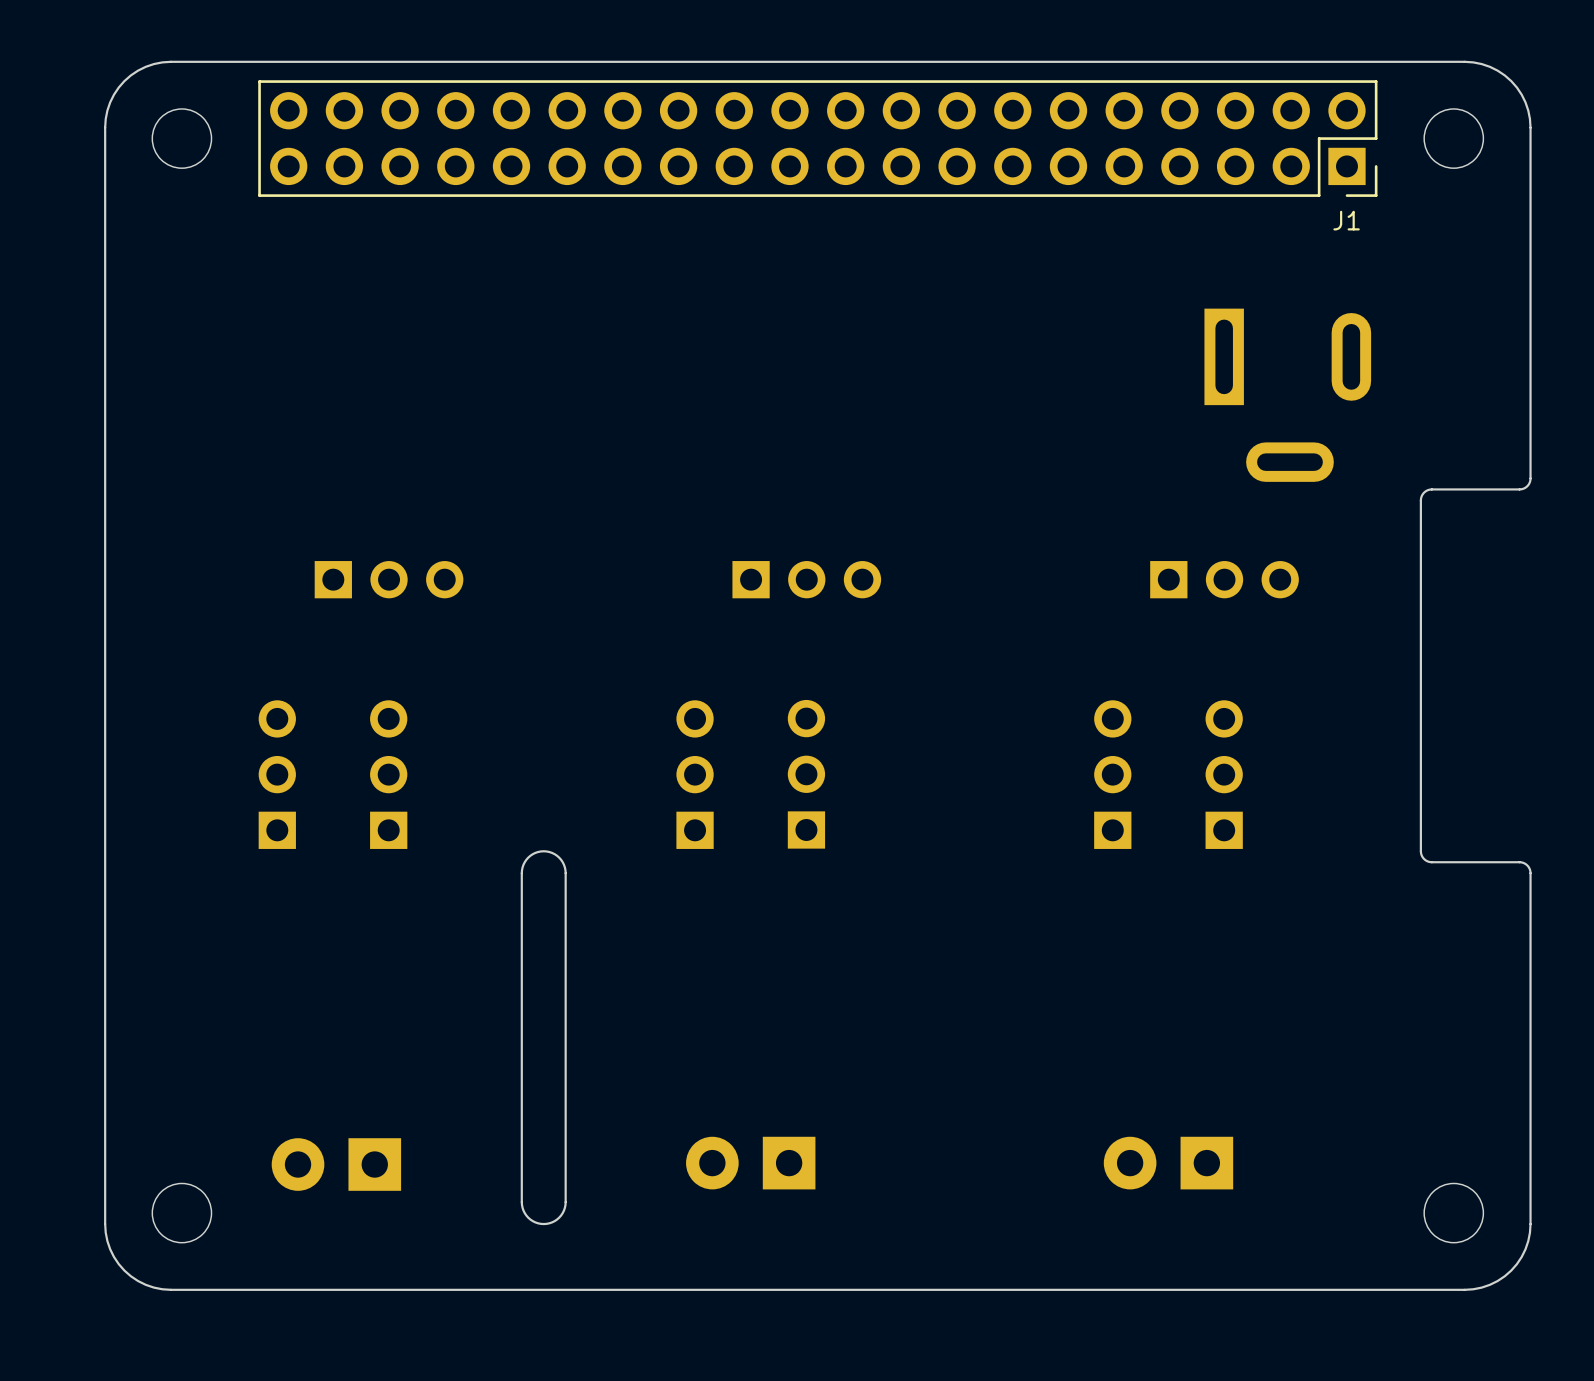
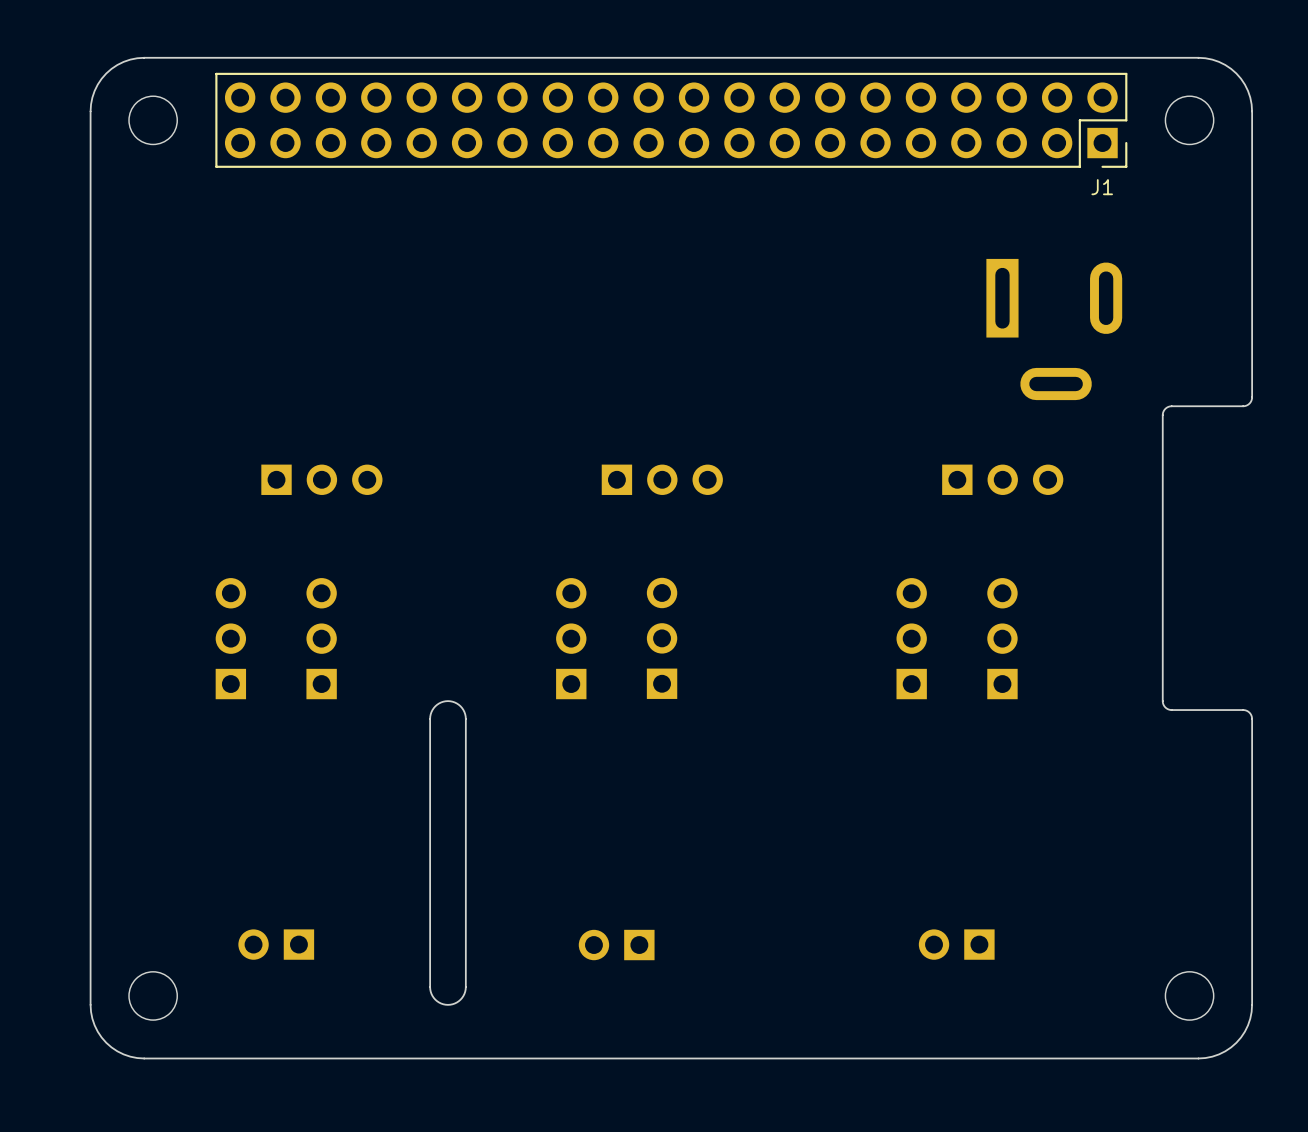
part footprint: [686, 1136, 816, 1190] -> [578, 929, 655, 961]
part footprint: [1103, 1136, 1234, 1190] -> [918, 929, 995, 960]
part footprint: [271, 1138, 402, 1191] -> [238, 929, 315, 960]

